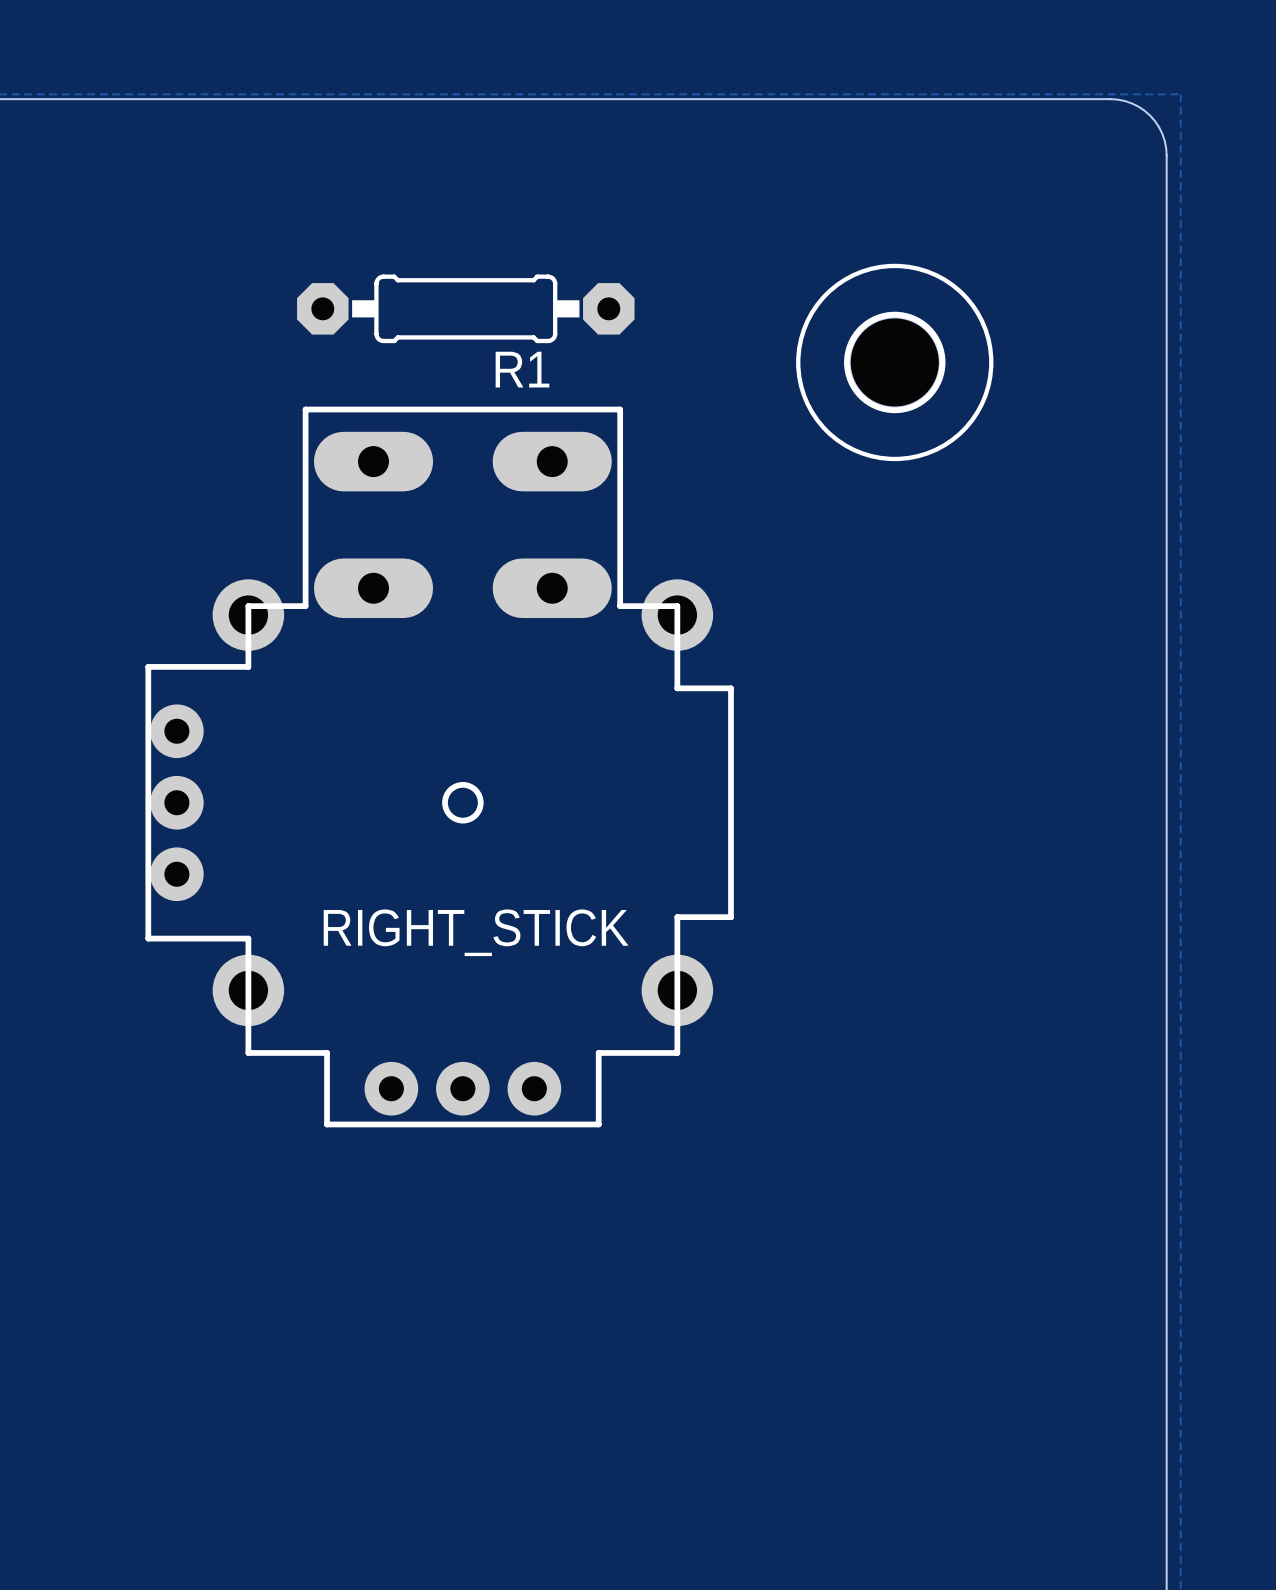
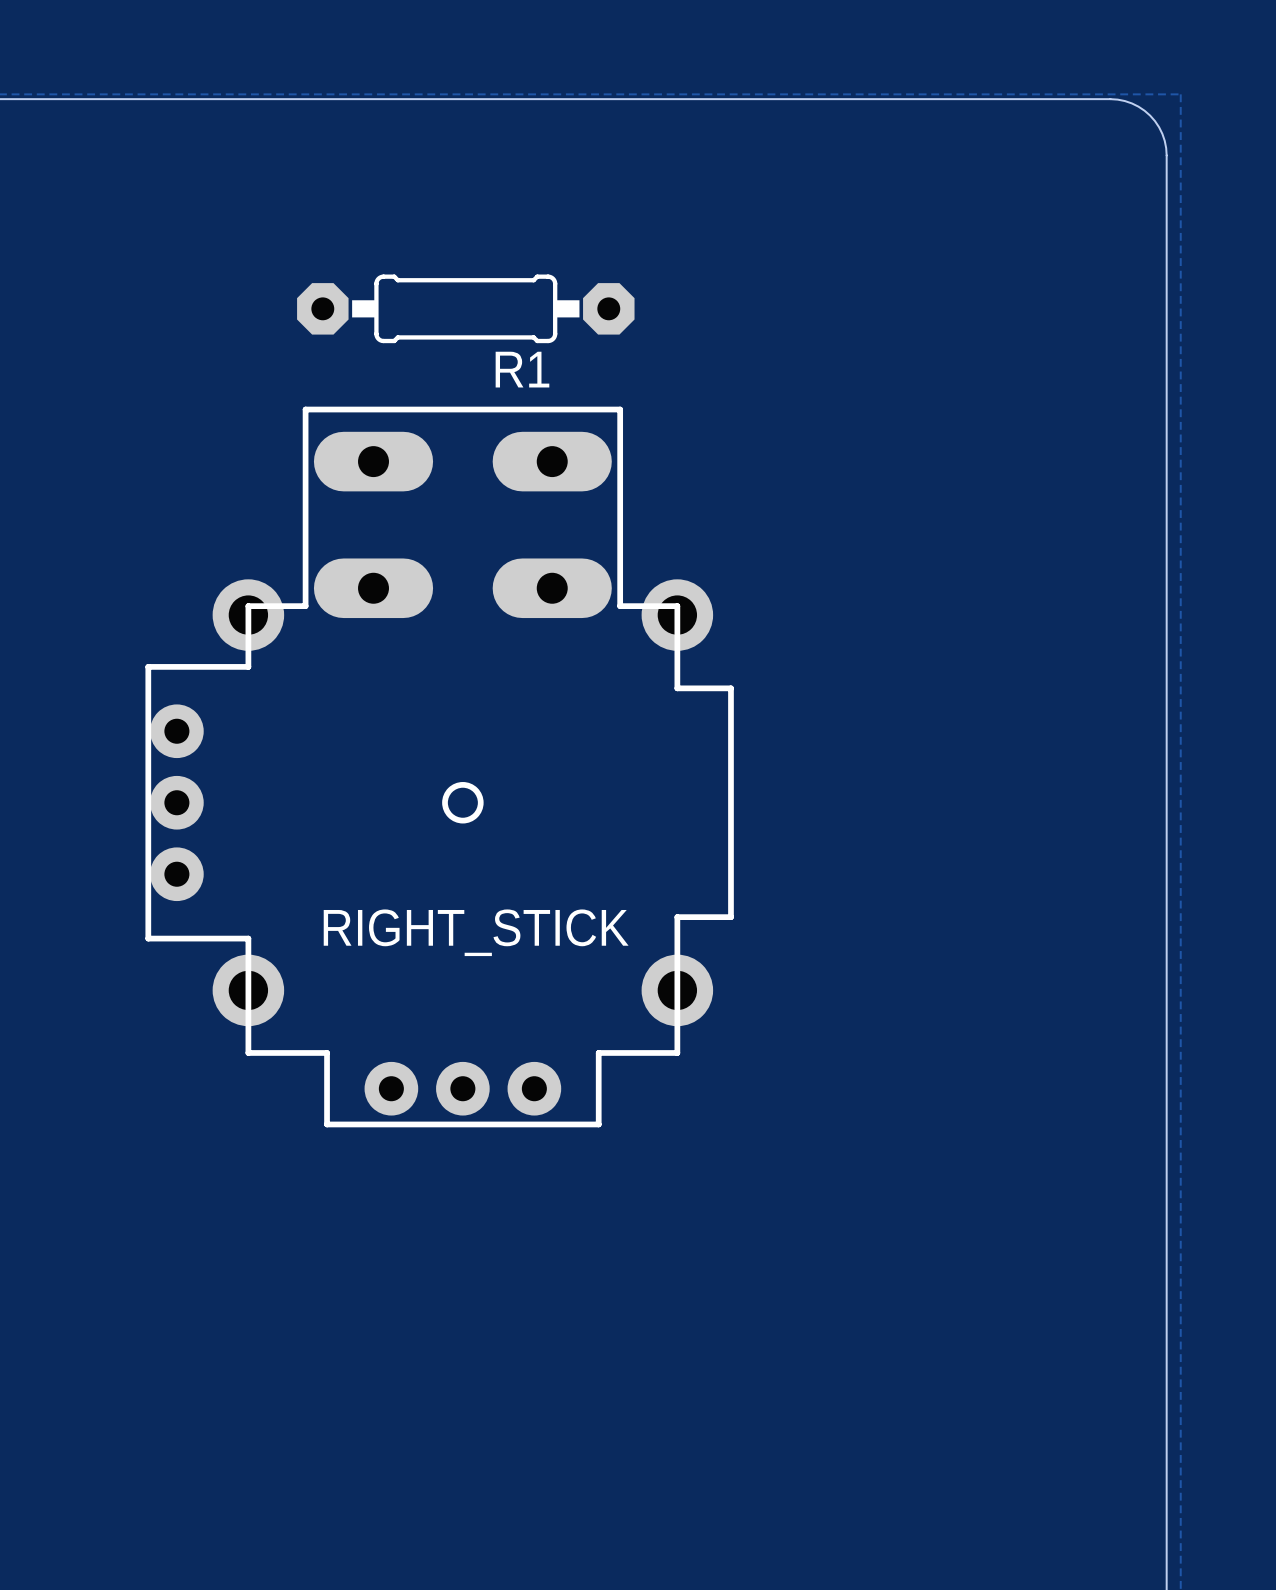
part: (894, 362) -> none

